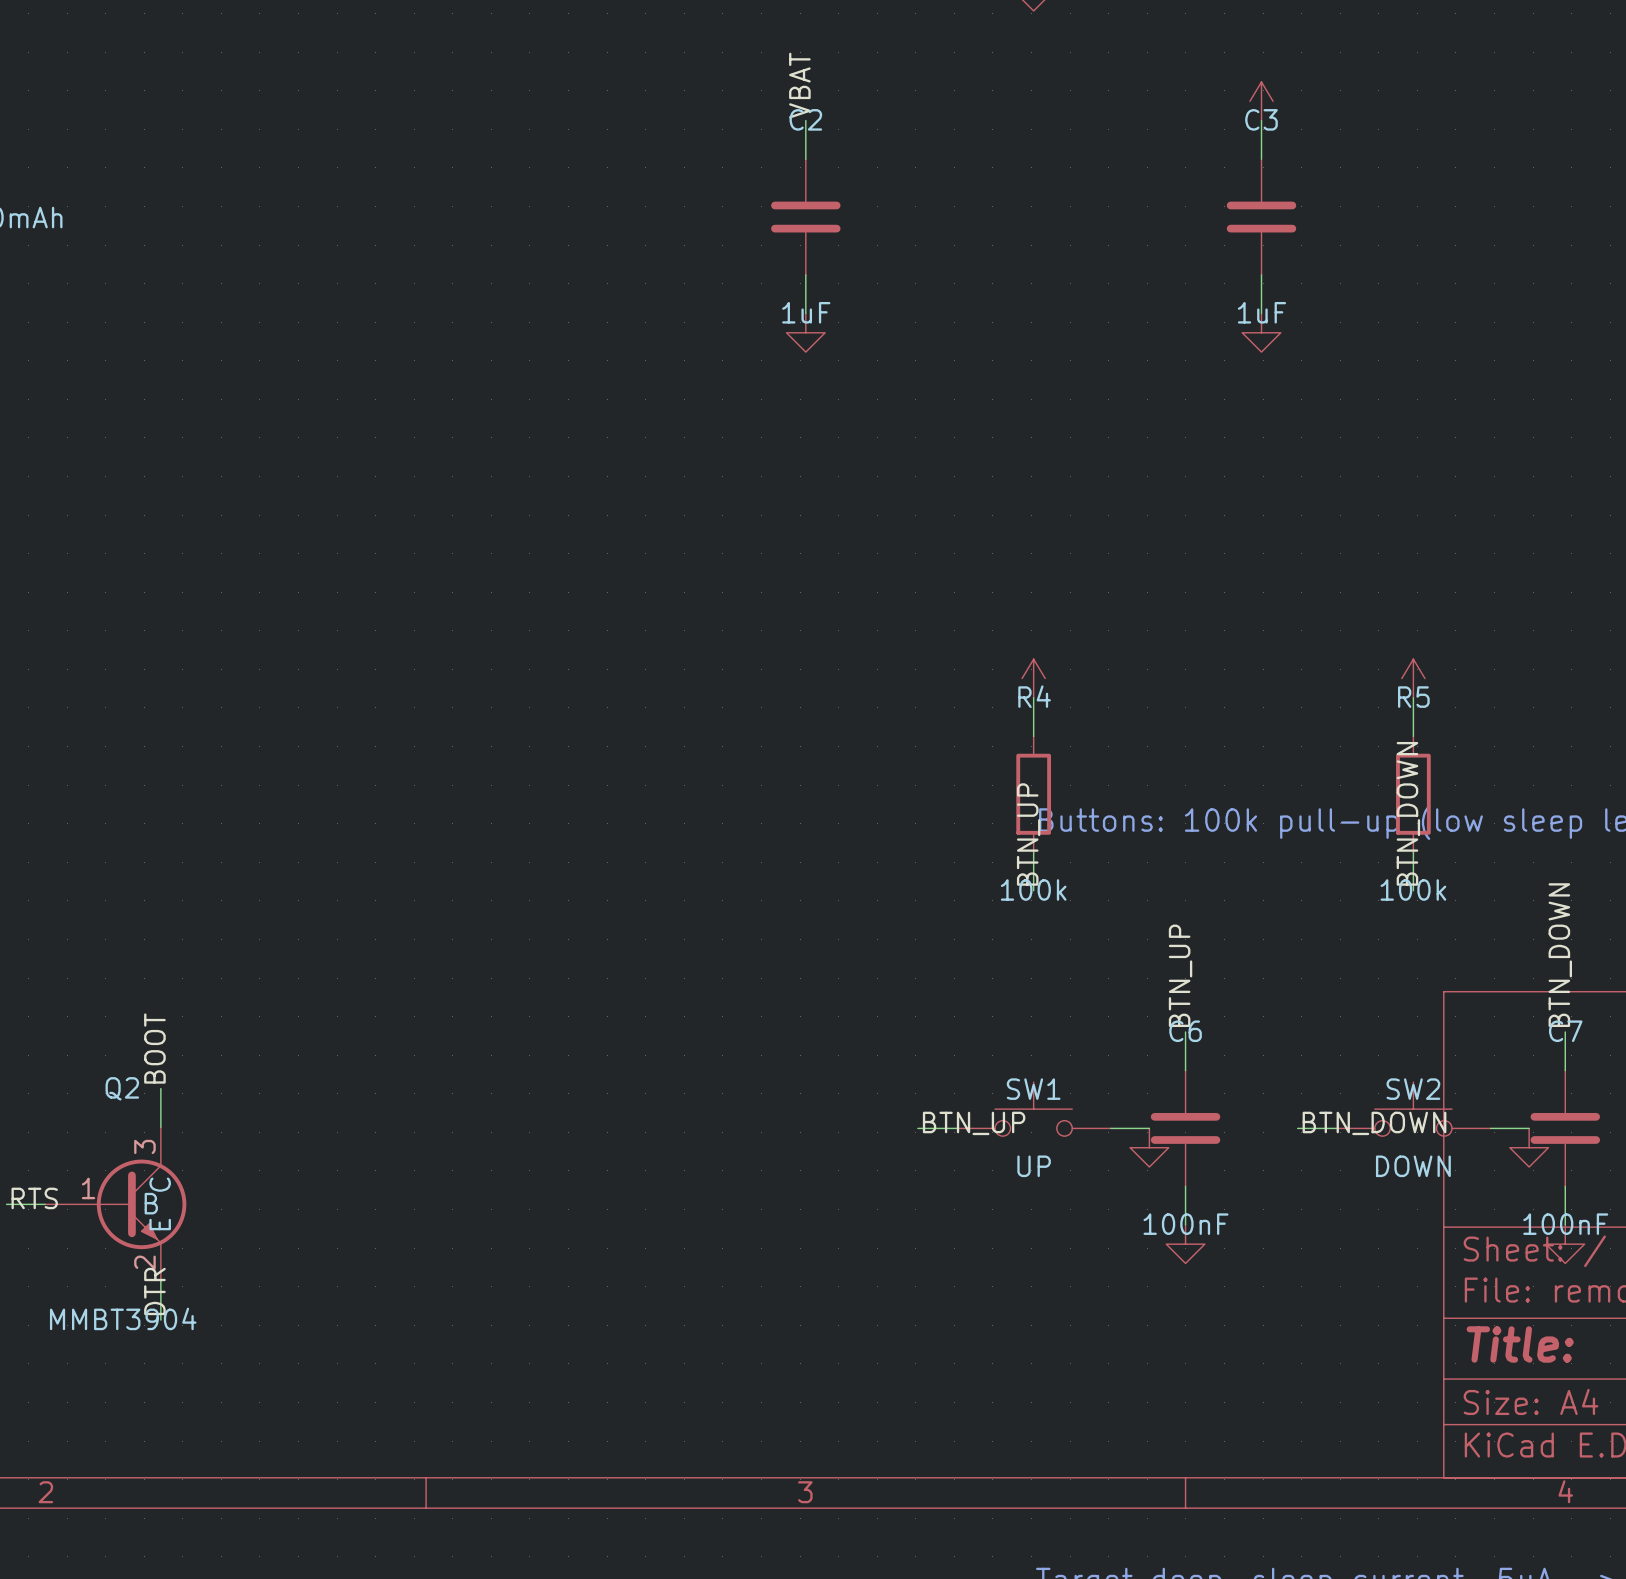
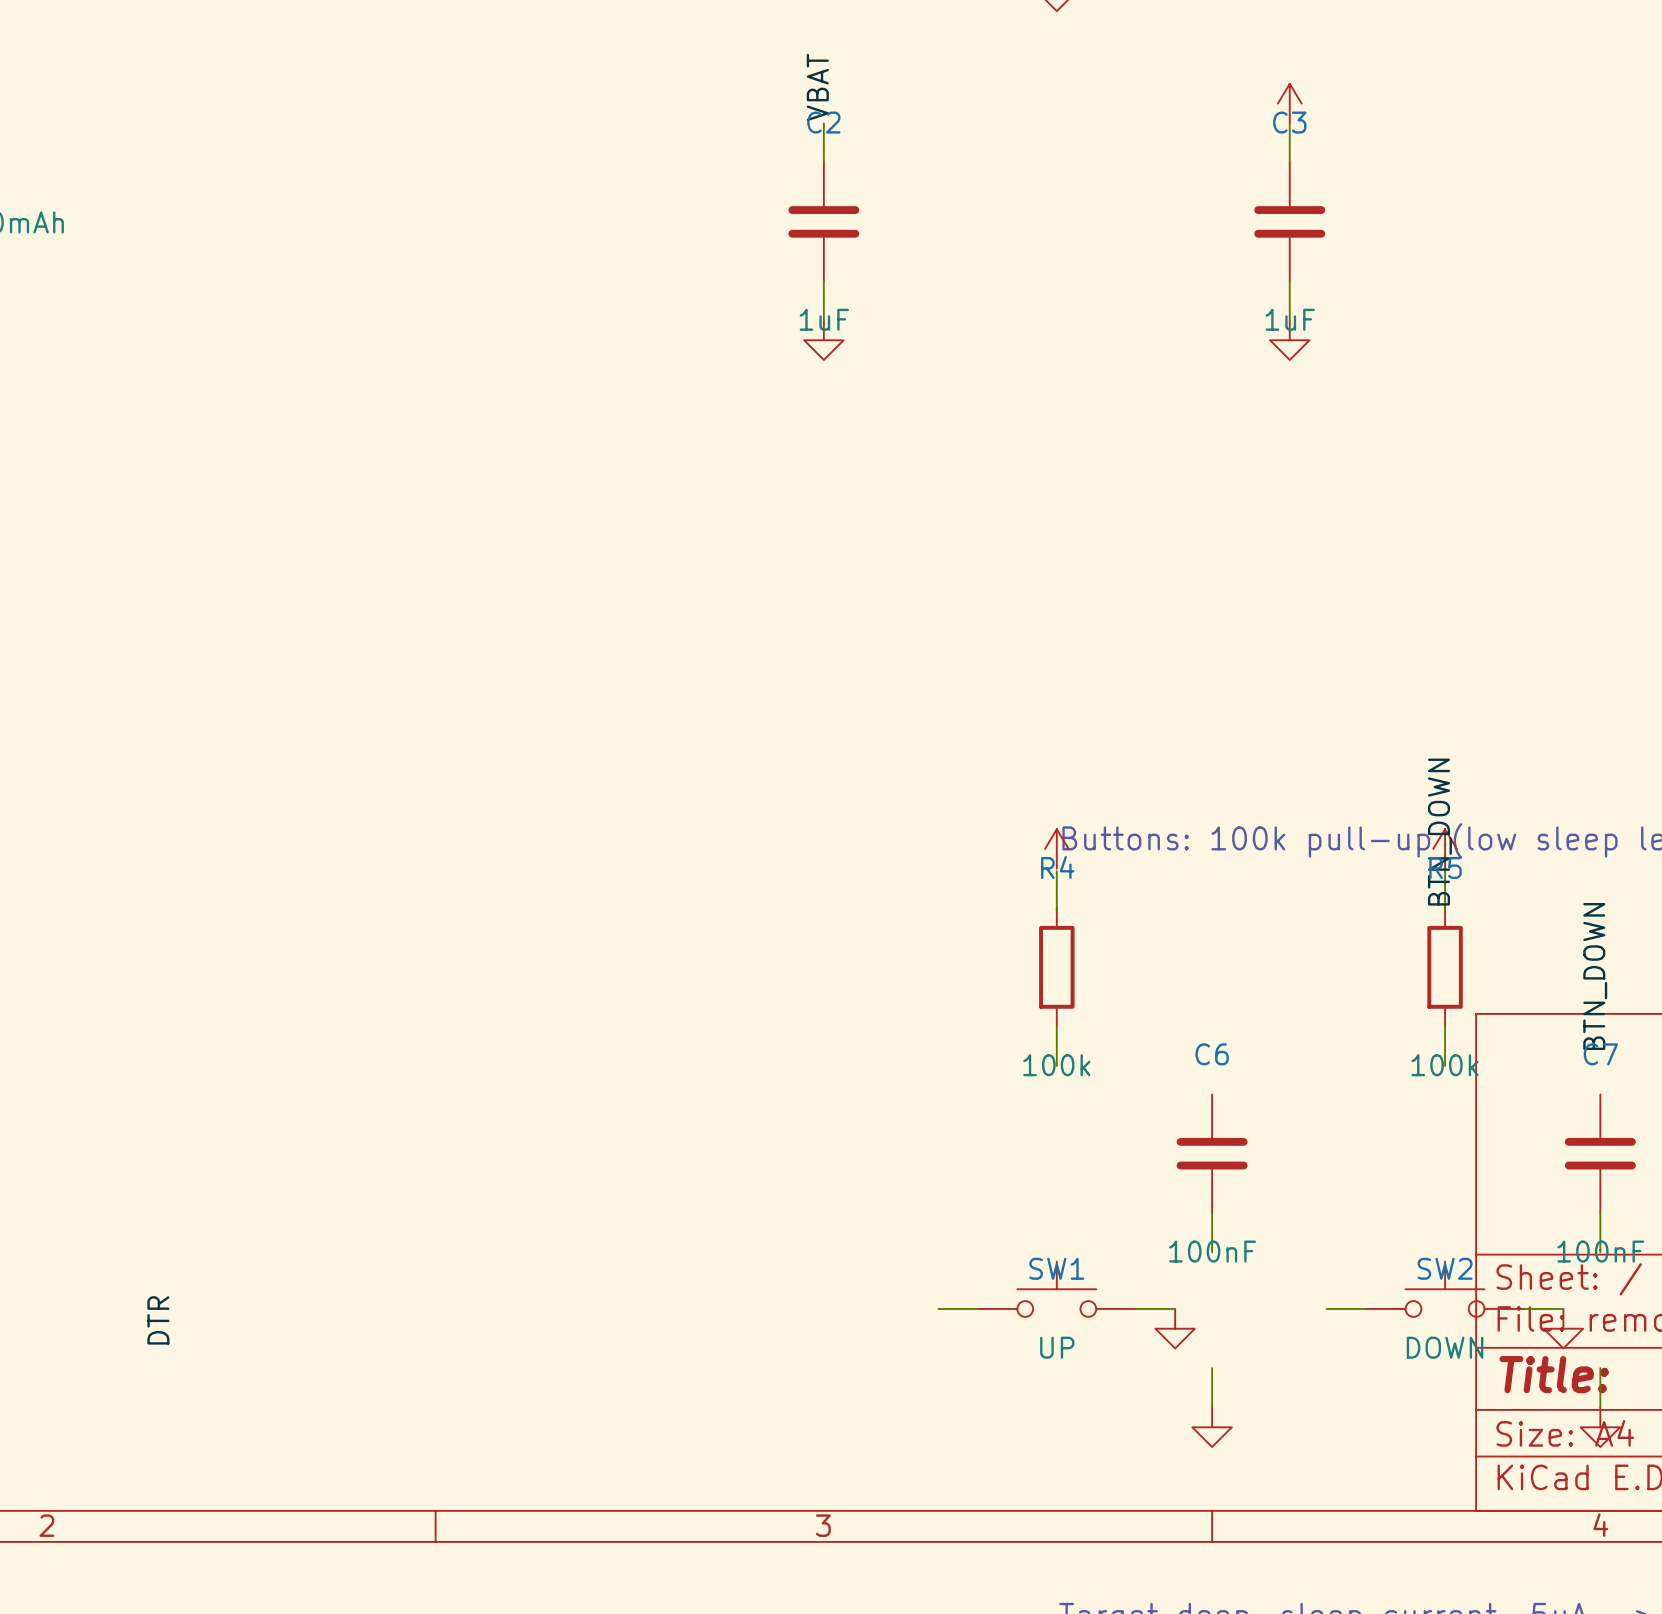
power symbol position: (1033, 678) -> (1056, 848)
power symbol position: (1413, 678) -> (1445, 848)
wire: (1033, 697) (1033, 736) -> (1056, 1026) (1056, 1065)
wire: (1413, 697) (1413, 736) -> (1445, 1026) (1445, 1065)
R4 position: (1033, 794) -> (1056, 967)
R5 position: (1413, 794) -> (1445, 967)
label: BTN_UP (1028, 834) -> none
label: BTN_UP (1180, 975) -> none
wire: (1185, 1031) (1185, 1070) -> (1212, 1368) (1212, 1407)
wire: (1565, 1031) (1565, 1070) -> (1600, 1368) (1600, 1407)
label: BOOT (154, 1048) -> none
wire: (160, 1088) (160, 1127) -> none
SW1 position: (1033, 1109) -> (1056, 1289)
SW2 position: (1413, 1109) -> (1445, 1289)
label: BTN_UP (974, 1123) -> none
label: BTN_DOWN (1374, 1123) -> none
wire: (917, 1128) (956, 1128) -> (938, 1308) (977, 1308)
wire: (1110, 1128) (1149, 1128) -> (1135, 1308) (1175, 1308)
wire: (1297, 1128) (1336, 1128) -> (1326, 1308) (1366, 1308)
wire: (1490, 1128) (1529, 1128) -> (1523, 1308) (1563, 1308)
power symbol: (1149, 1147) -> none
power symbol: (1529, 1147) -> none
label: RTS (34, 1198) -> none
wire: (6, 1204) (45, 1204) -> none
Q2: MMBT3904 (115, 1204) -> none
power symbol position: (1185, 1244) -> (1175, 1328)
power symbol position: (1565, 1244) -> (1563, 1328)
wire: (160, 1281) (160, 1320) -> none
power symbol: none -> (1212, 1427)
power symbol: none -> (1600, 1427)

